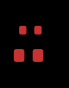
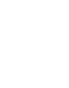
part: (30, 30) -> none
part: (28, 55) -> none

